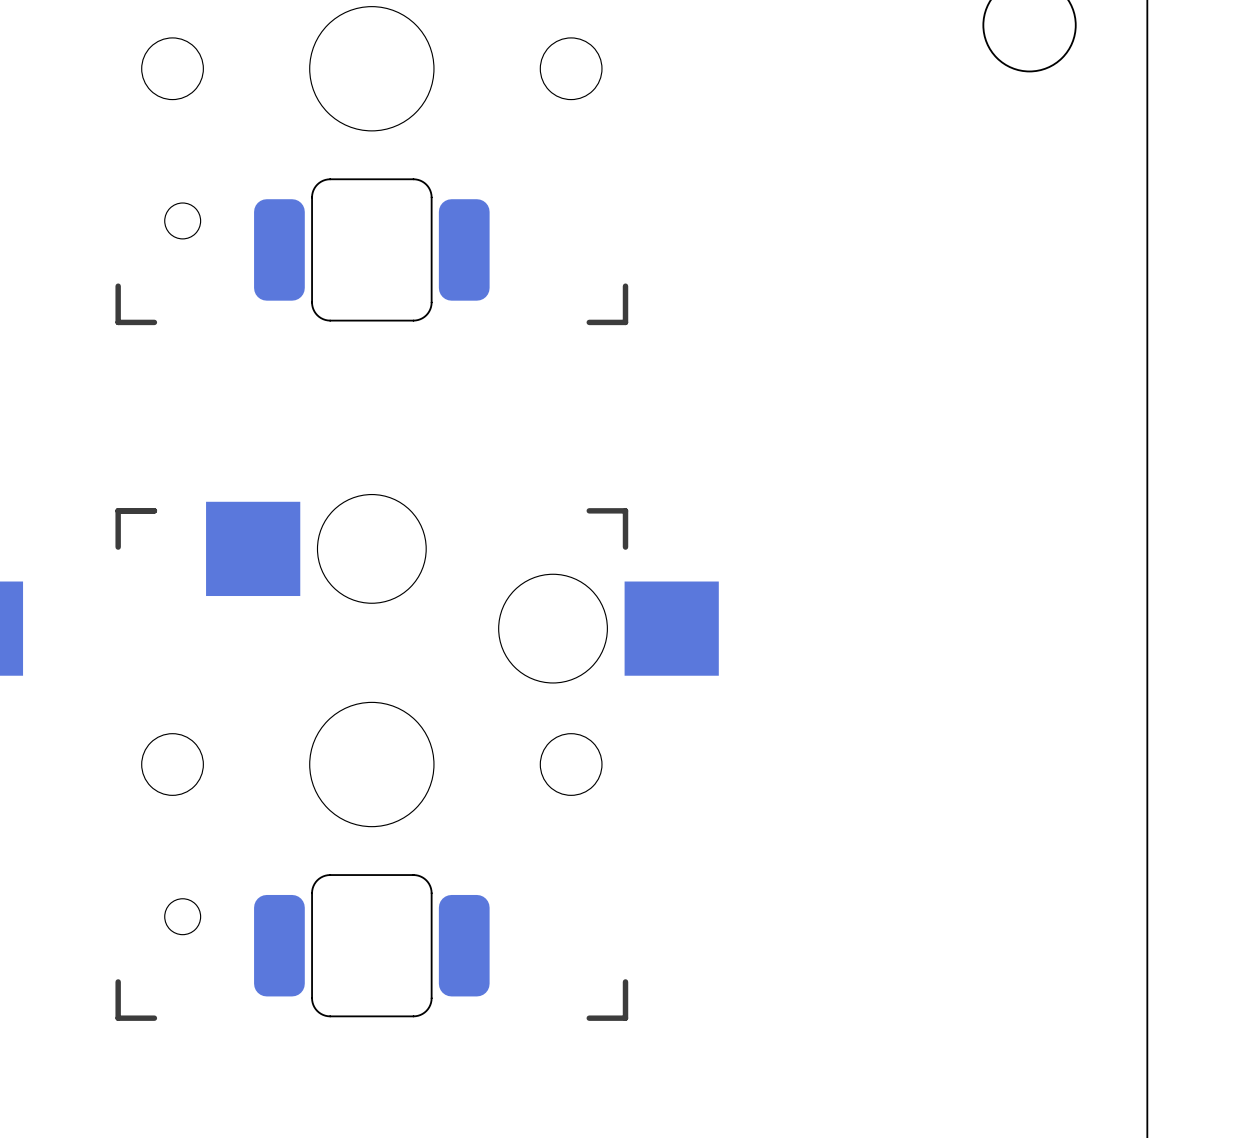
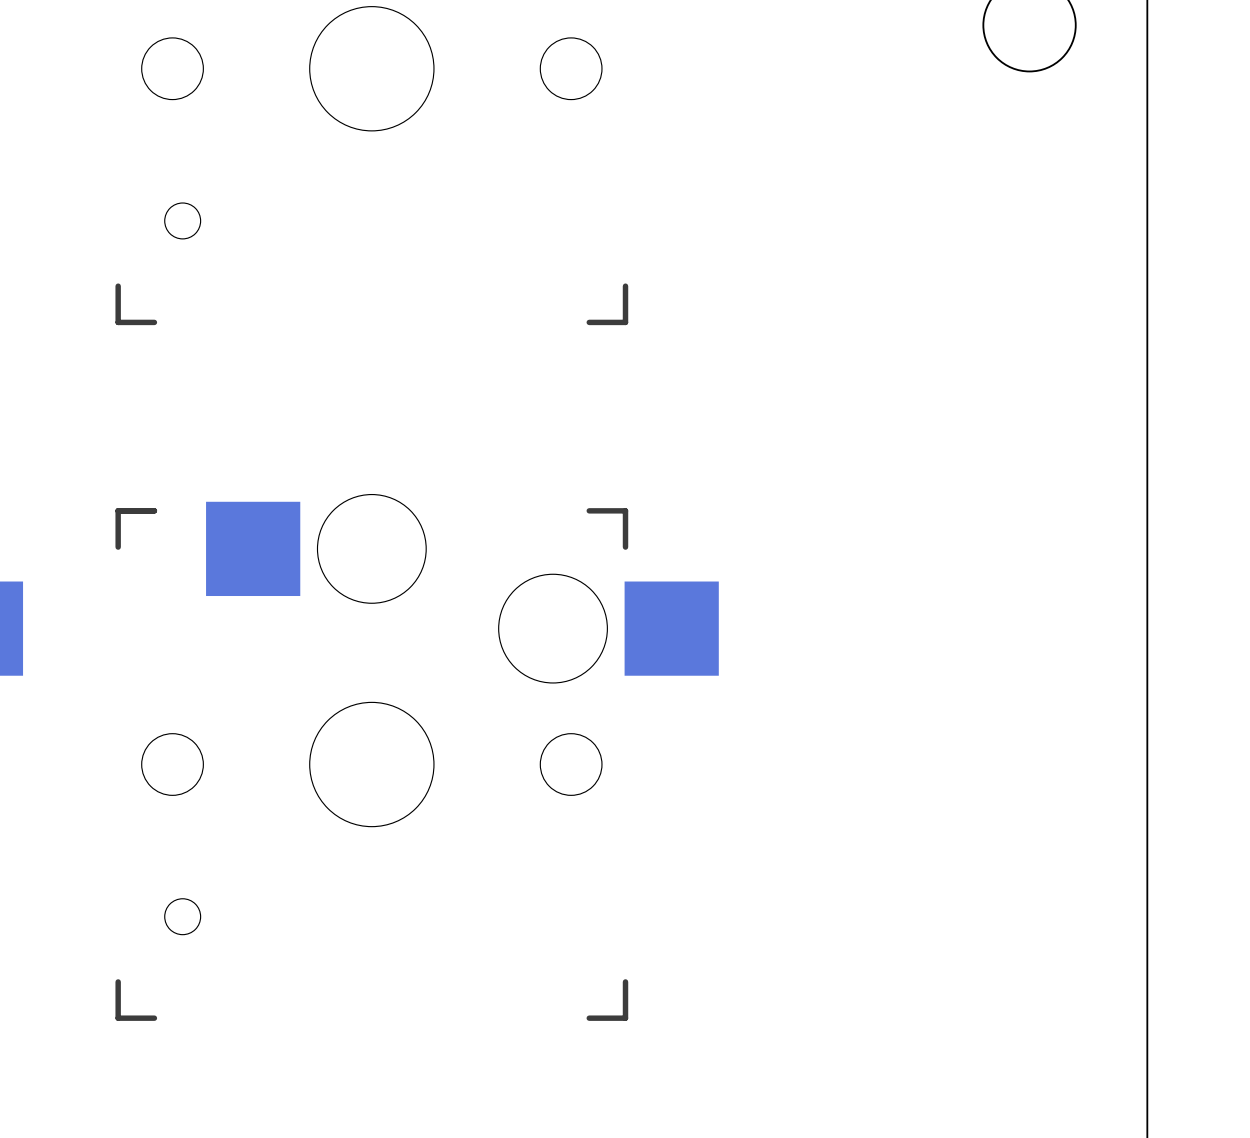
part: (371, 249) -> none
part: (371, 945) -> none

